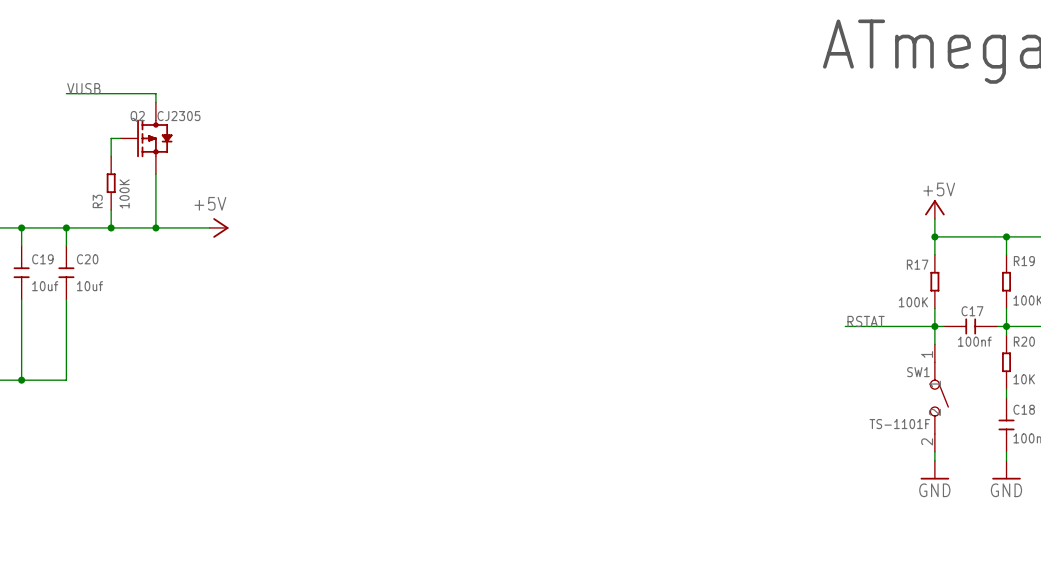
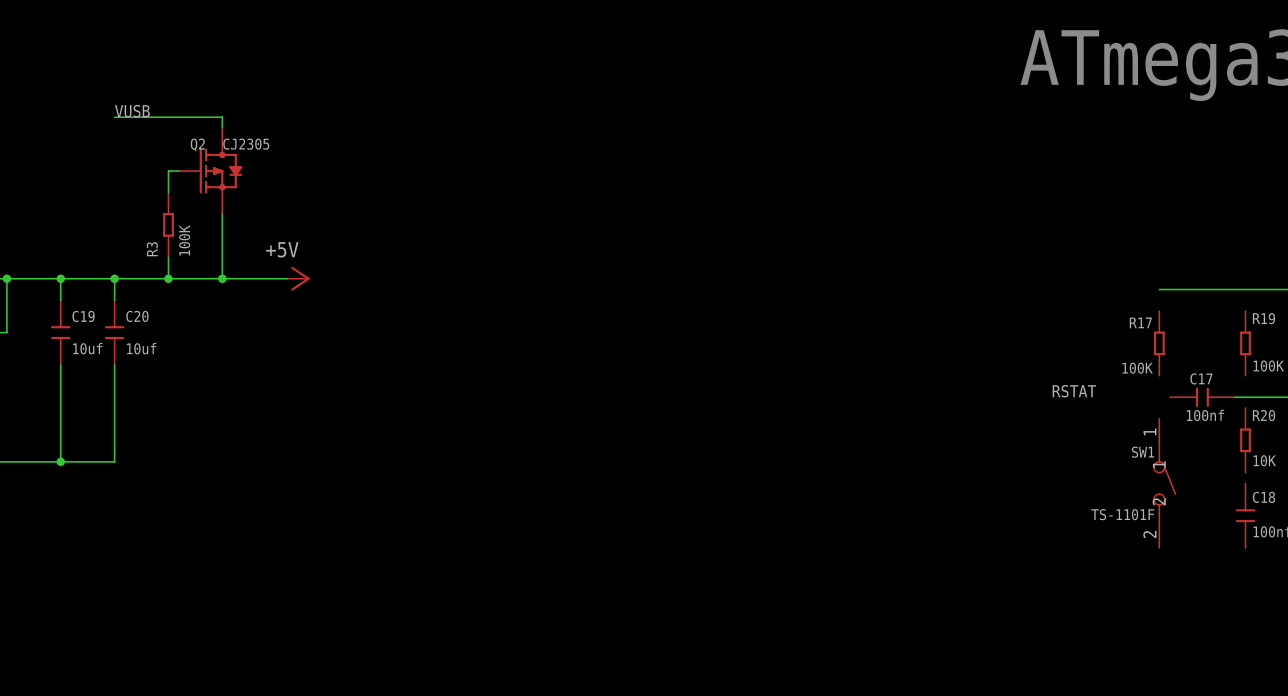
power symbol: +5V (934, 209) -> none
wire: (934, 219) (934, 254) -> none
junction: (934, 236) -> none
wire: (1006, 236) (1006, 254) -> none
junction: (1006, 236) -> none
wire: (934, 308) (934, 344) -> none
wire: (1006, 308) (1006, 335) -> none
wire: (845, 326) (943, 326) -> none
junction: (934, 326) -> none
junction: (1006, 326) -> none
wire: (1006, 389) (1006, 398) -> none
wire: (934, 451) (934, 460) -> none
wire: (1006, 451) (1006, 460) -> none
power symbol: GND (934, 470) -> none
power symbol: GND (1006, 470) -> none

